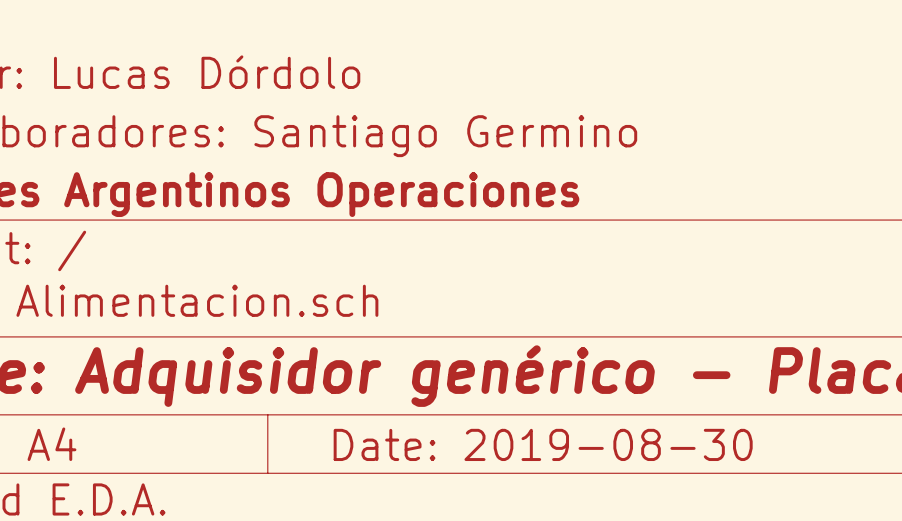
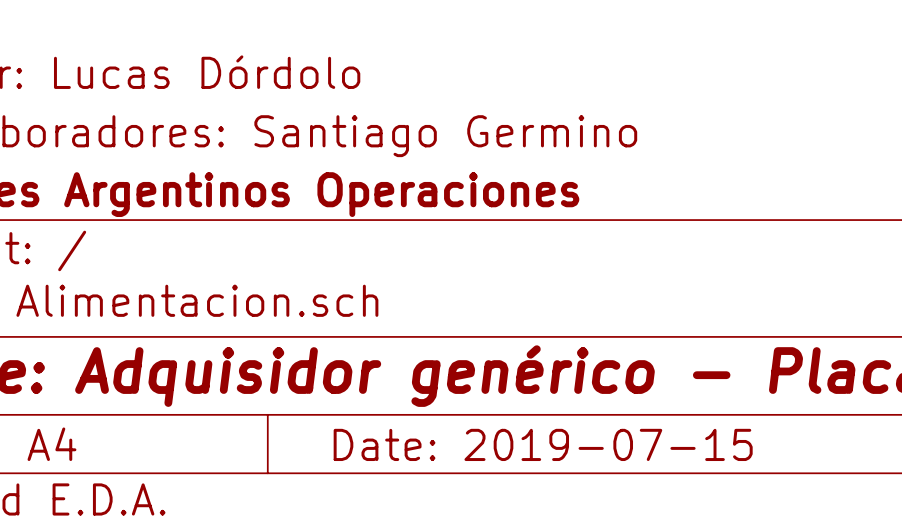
title block: Date: 2019-08-30 (543, 444) -> Date: 2019-07-15 (543, 444)

